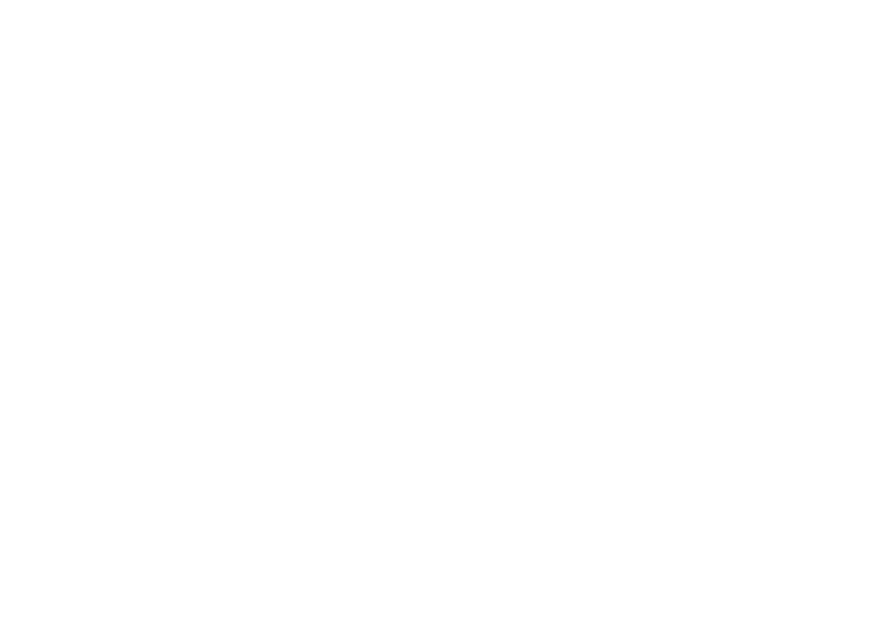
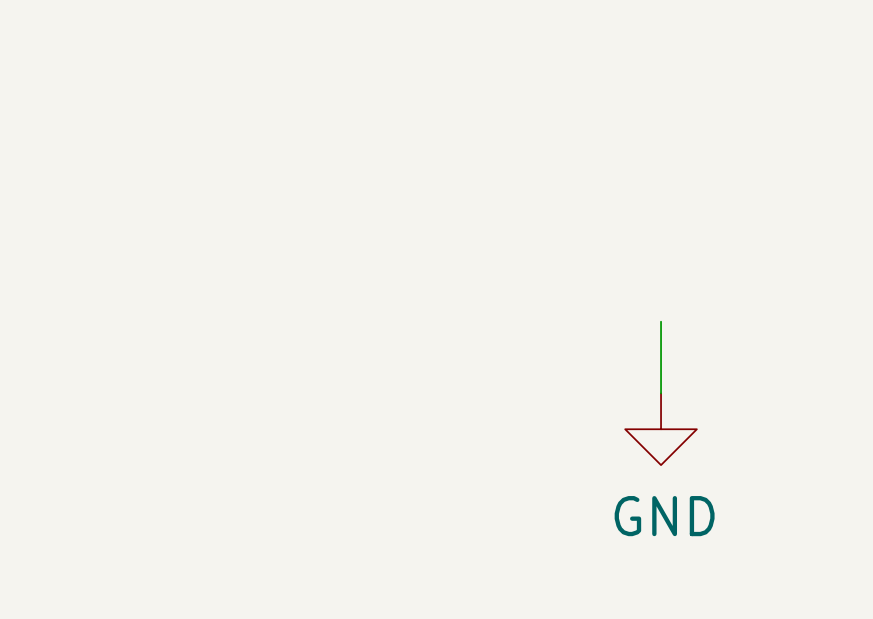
wire: none -> (661, 321) (661, 393)
power symbol: none -> GND (661, 429)

